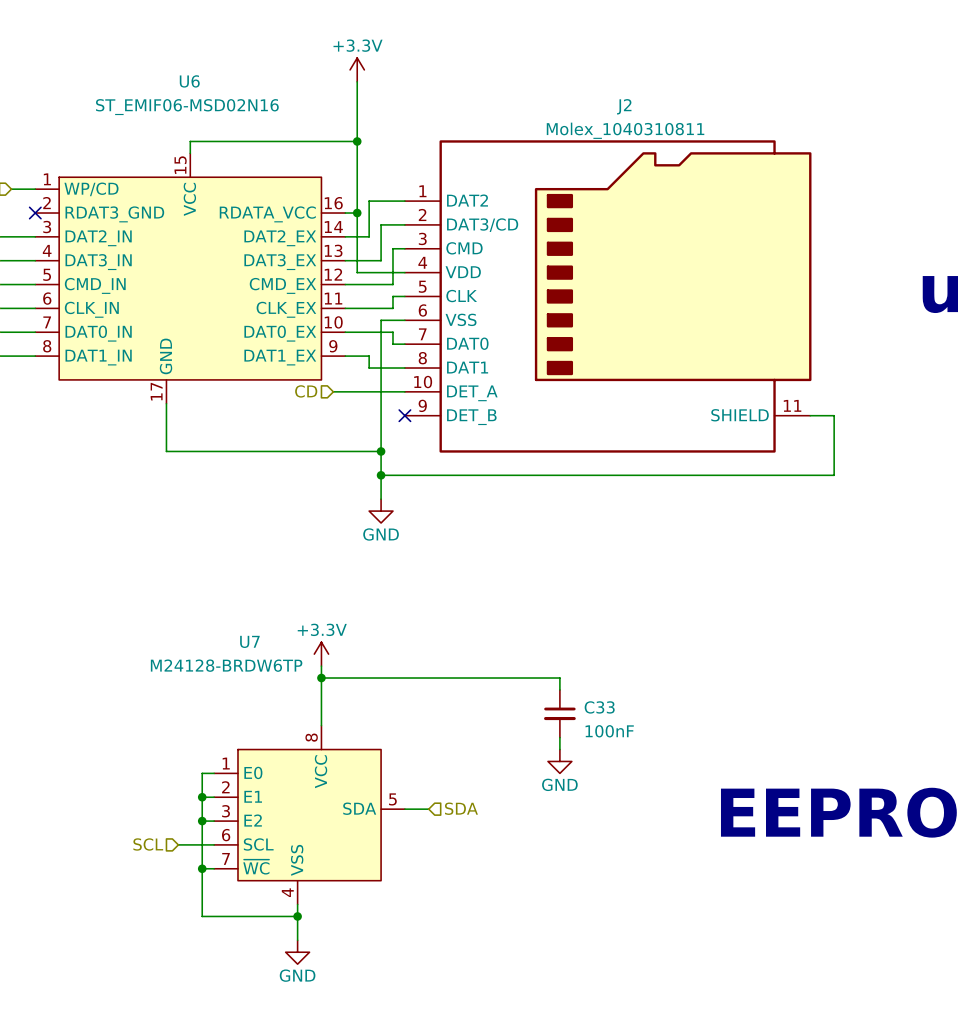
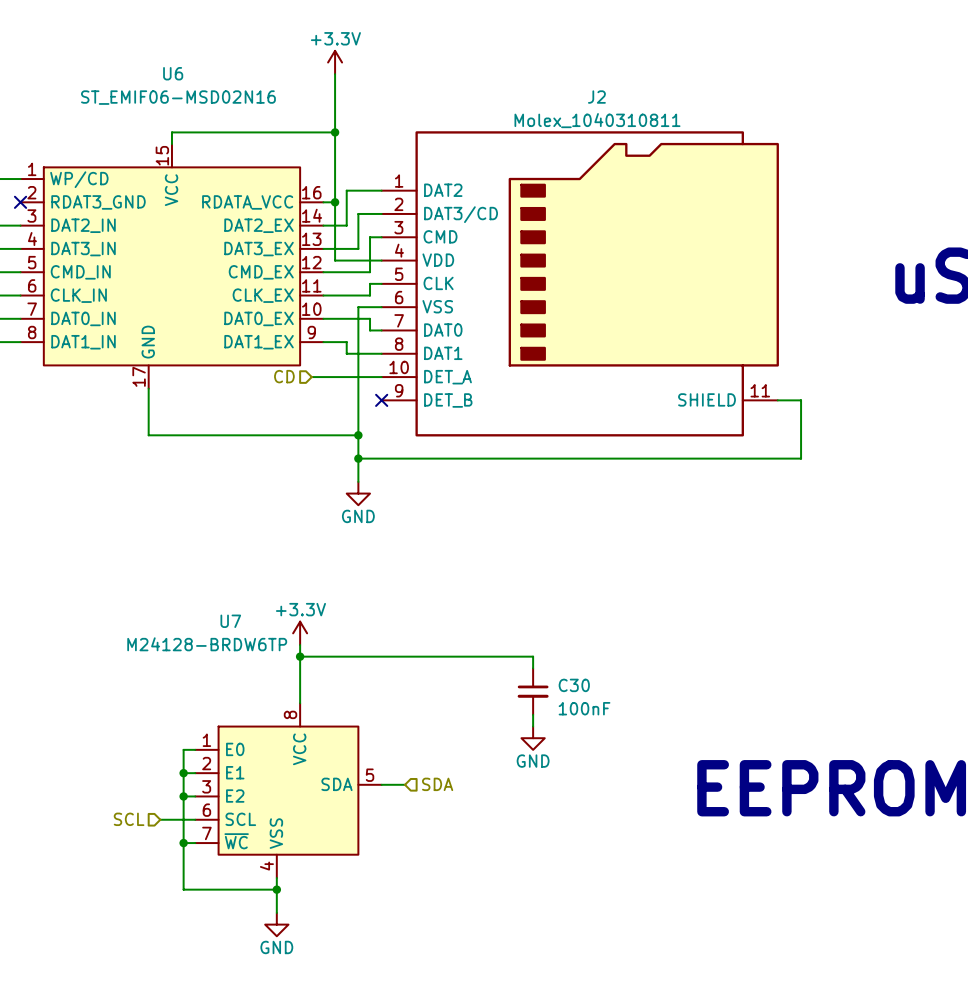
C33 name: C33 (599, 707) -> C30 (574, 685)

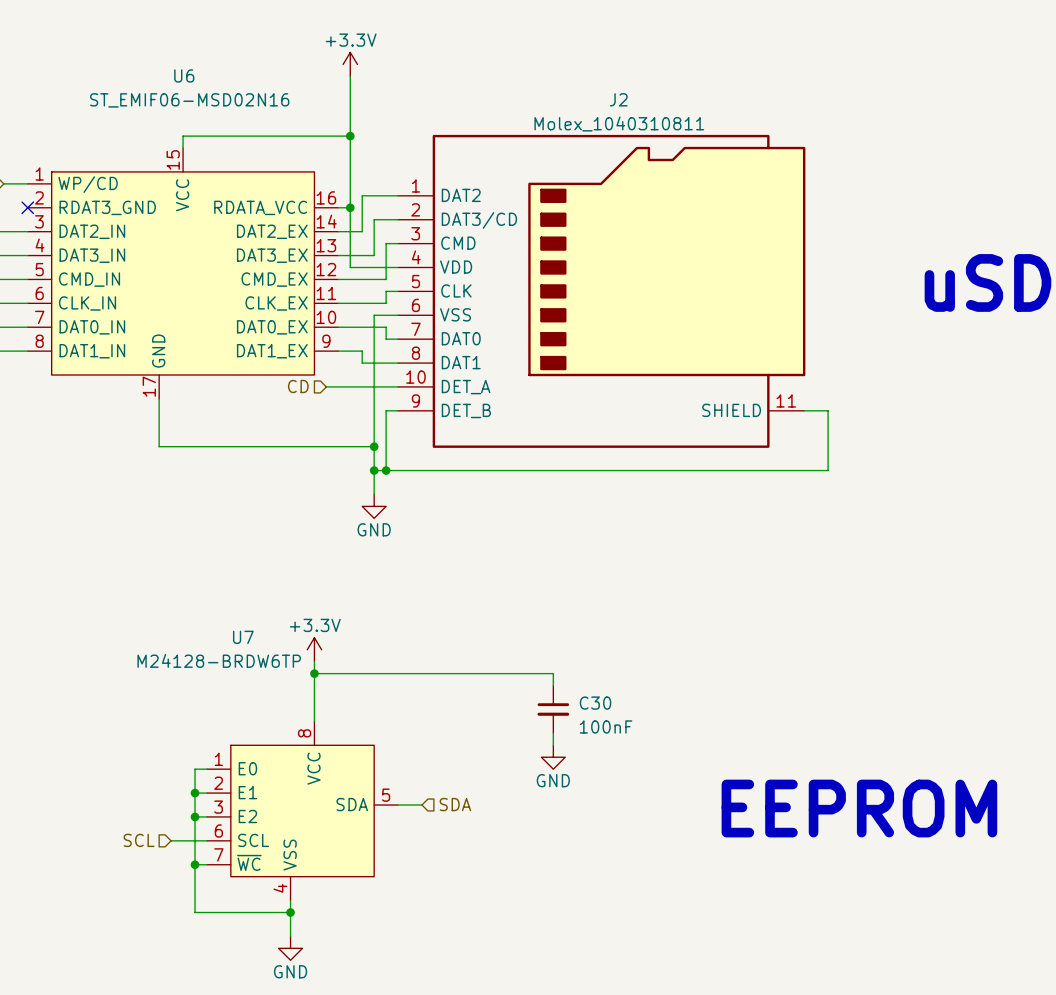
wire: none -> (398, 410) (386, 410) (386, 470)
no-connect mark: (381, 400) -> none
junction: none -> (386, 470)

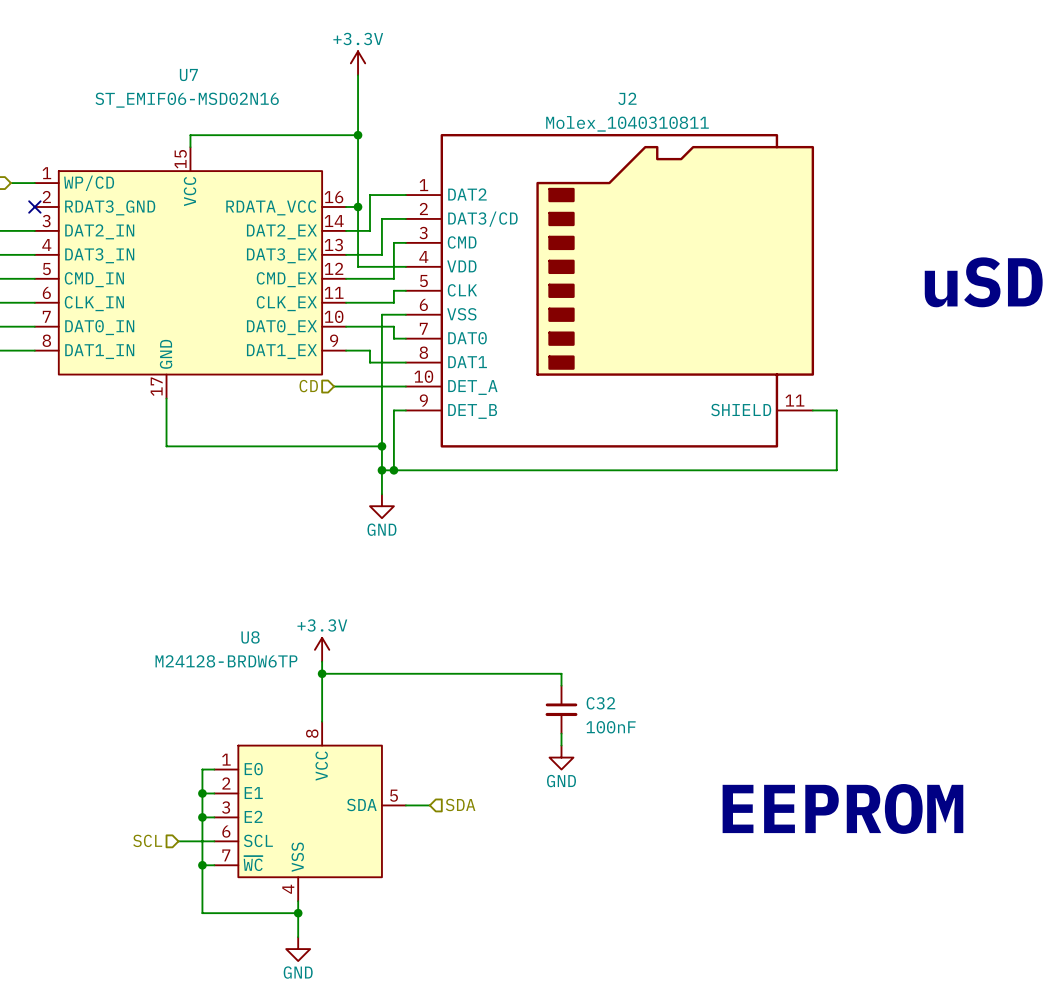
U6 name: U6 (184, 75) -> U7 (188, 74)
U7 name: U7 (243, 637) -> U8 (250, 637)
C30 name: C30 (595, 703) -> C32 (600, 703)

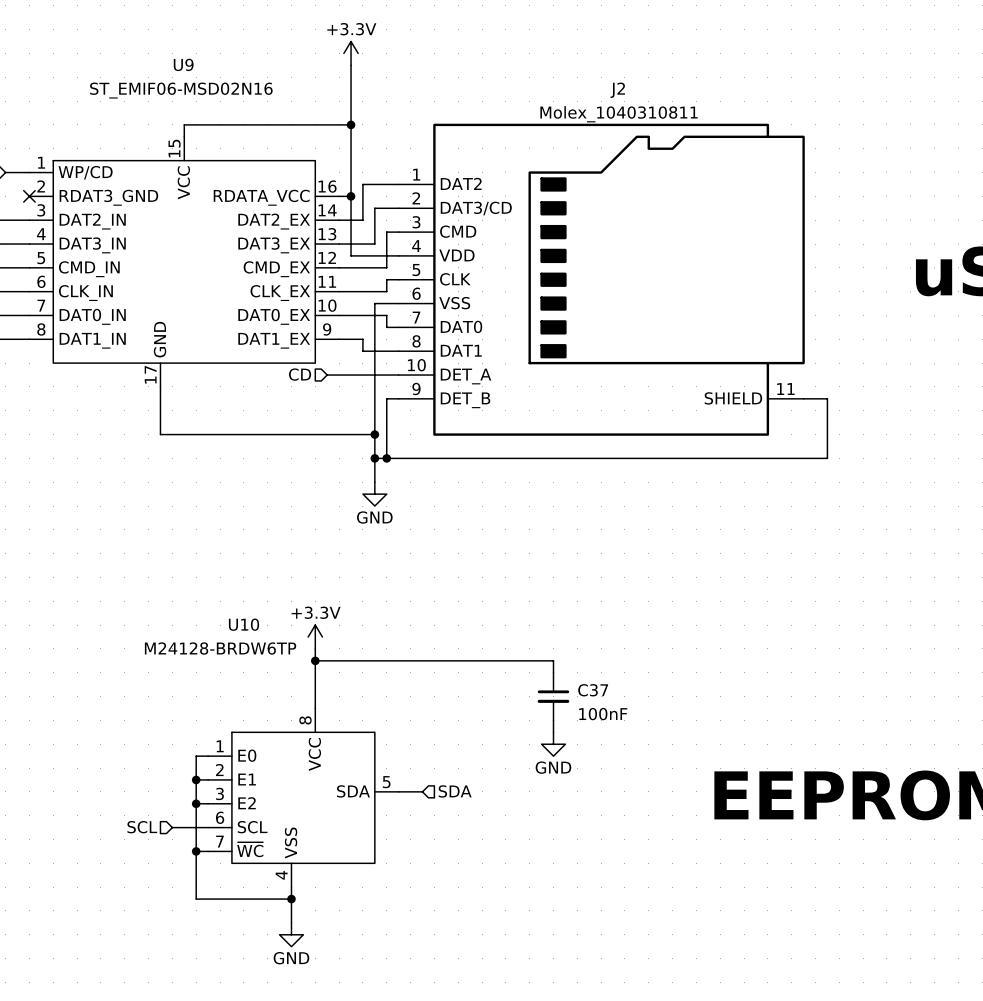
U7 name: U7 (188, 74) -> U9 (183, 64)
U8 name: U8 (250, 637) -> U10 (244, 624)
C32 name: C32 (600, 703) -> C37 (593, 690)

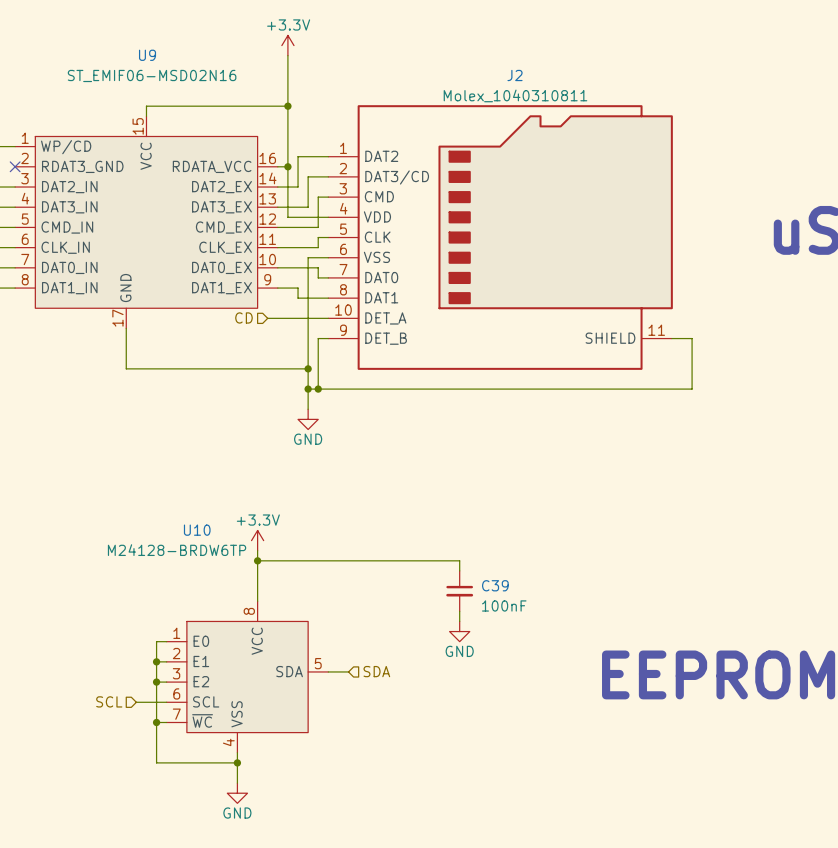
C37 name: C37 (593, 690) -> C39 (495, 585)

